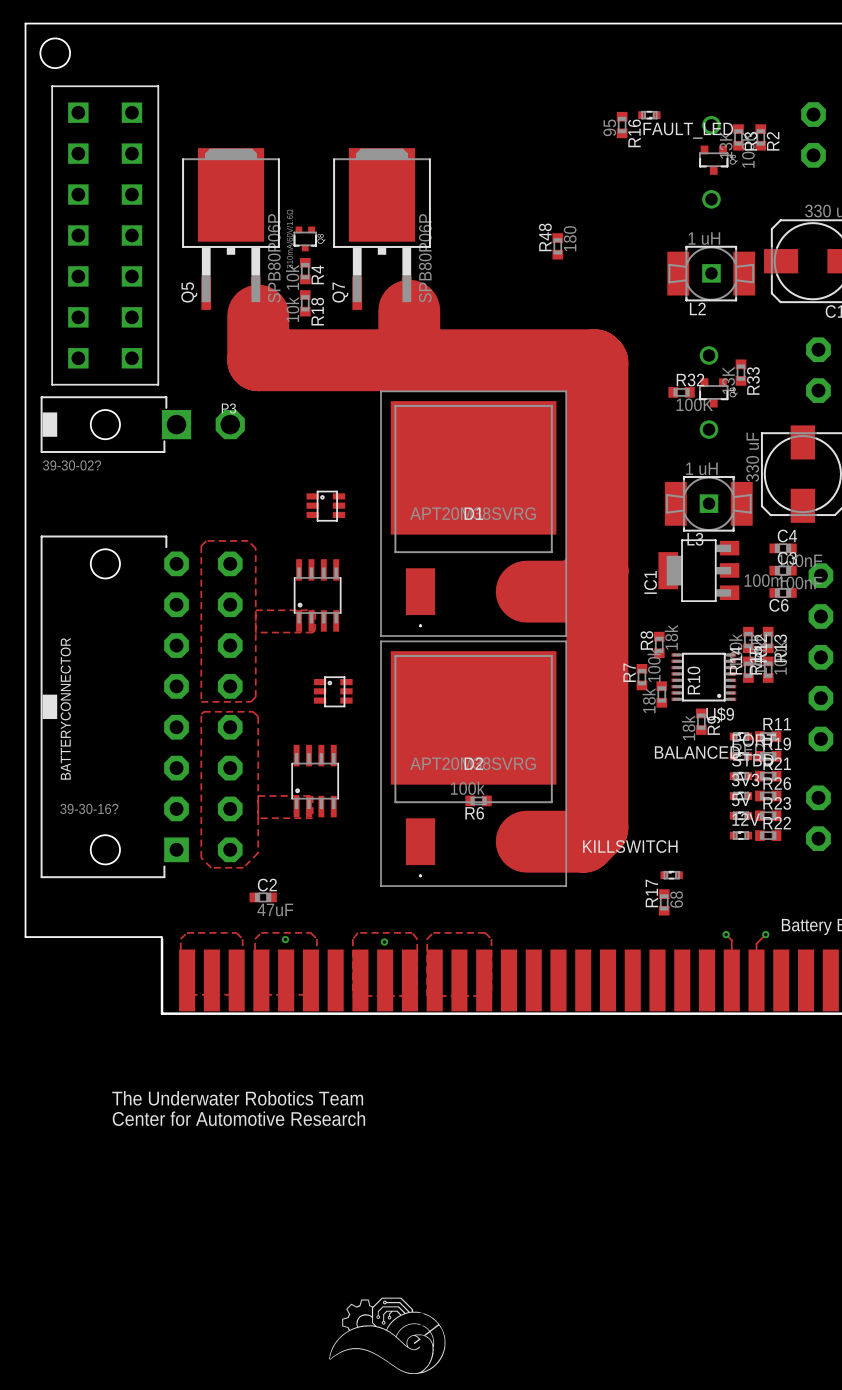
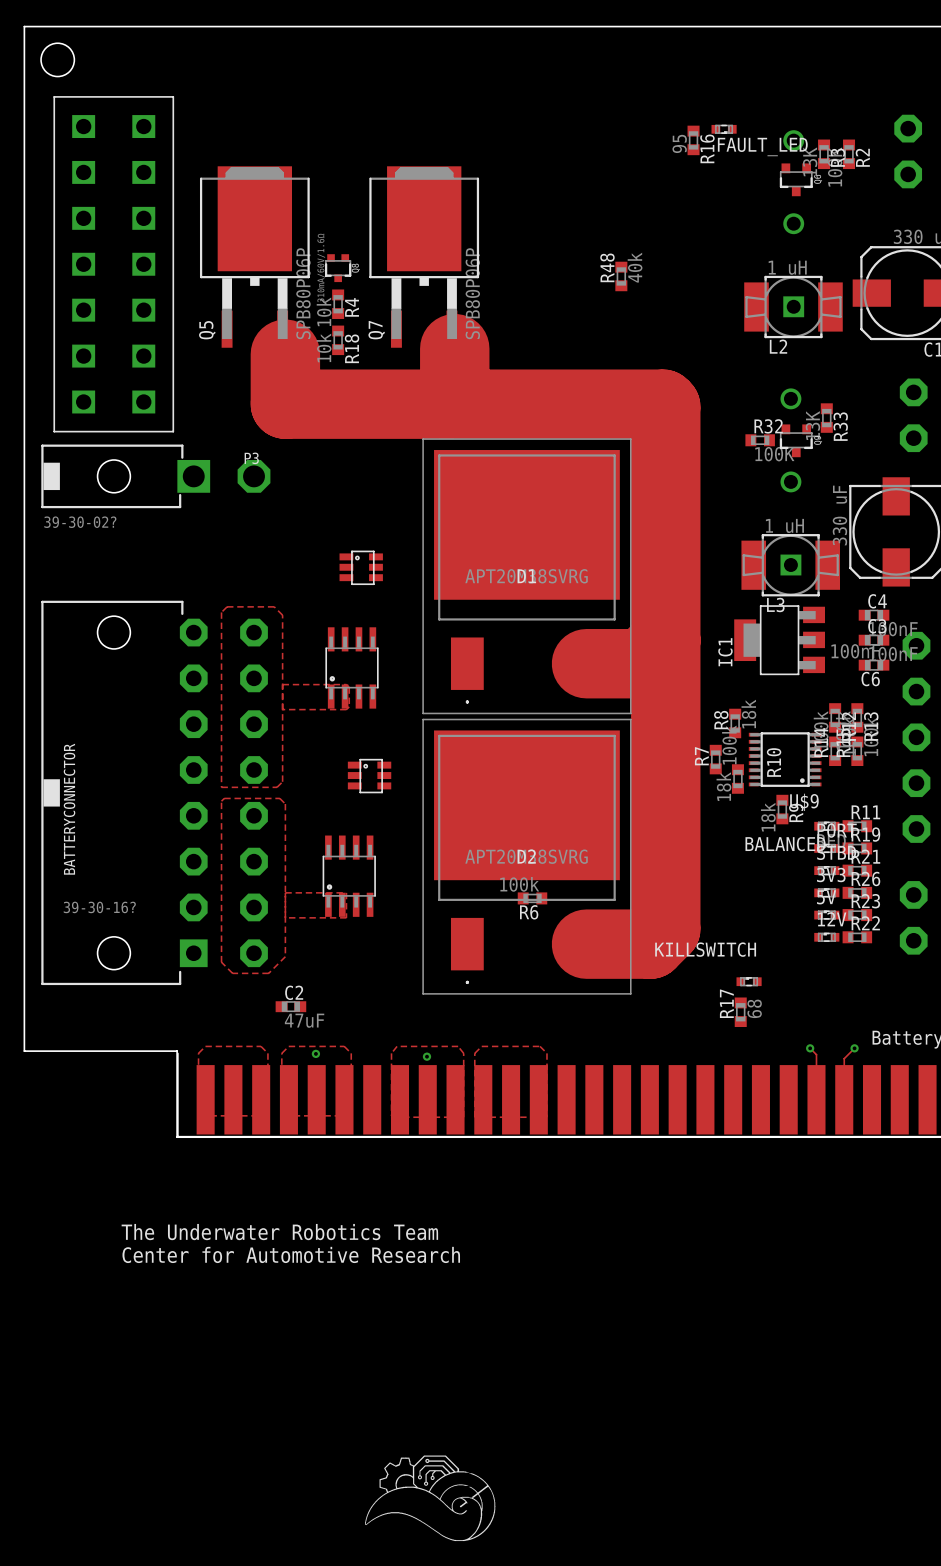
R48 value: 180 (570, 238) -> 40k (635, 267)

